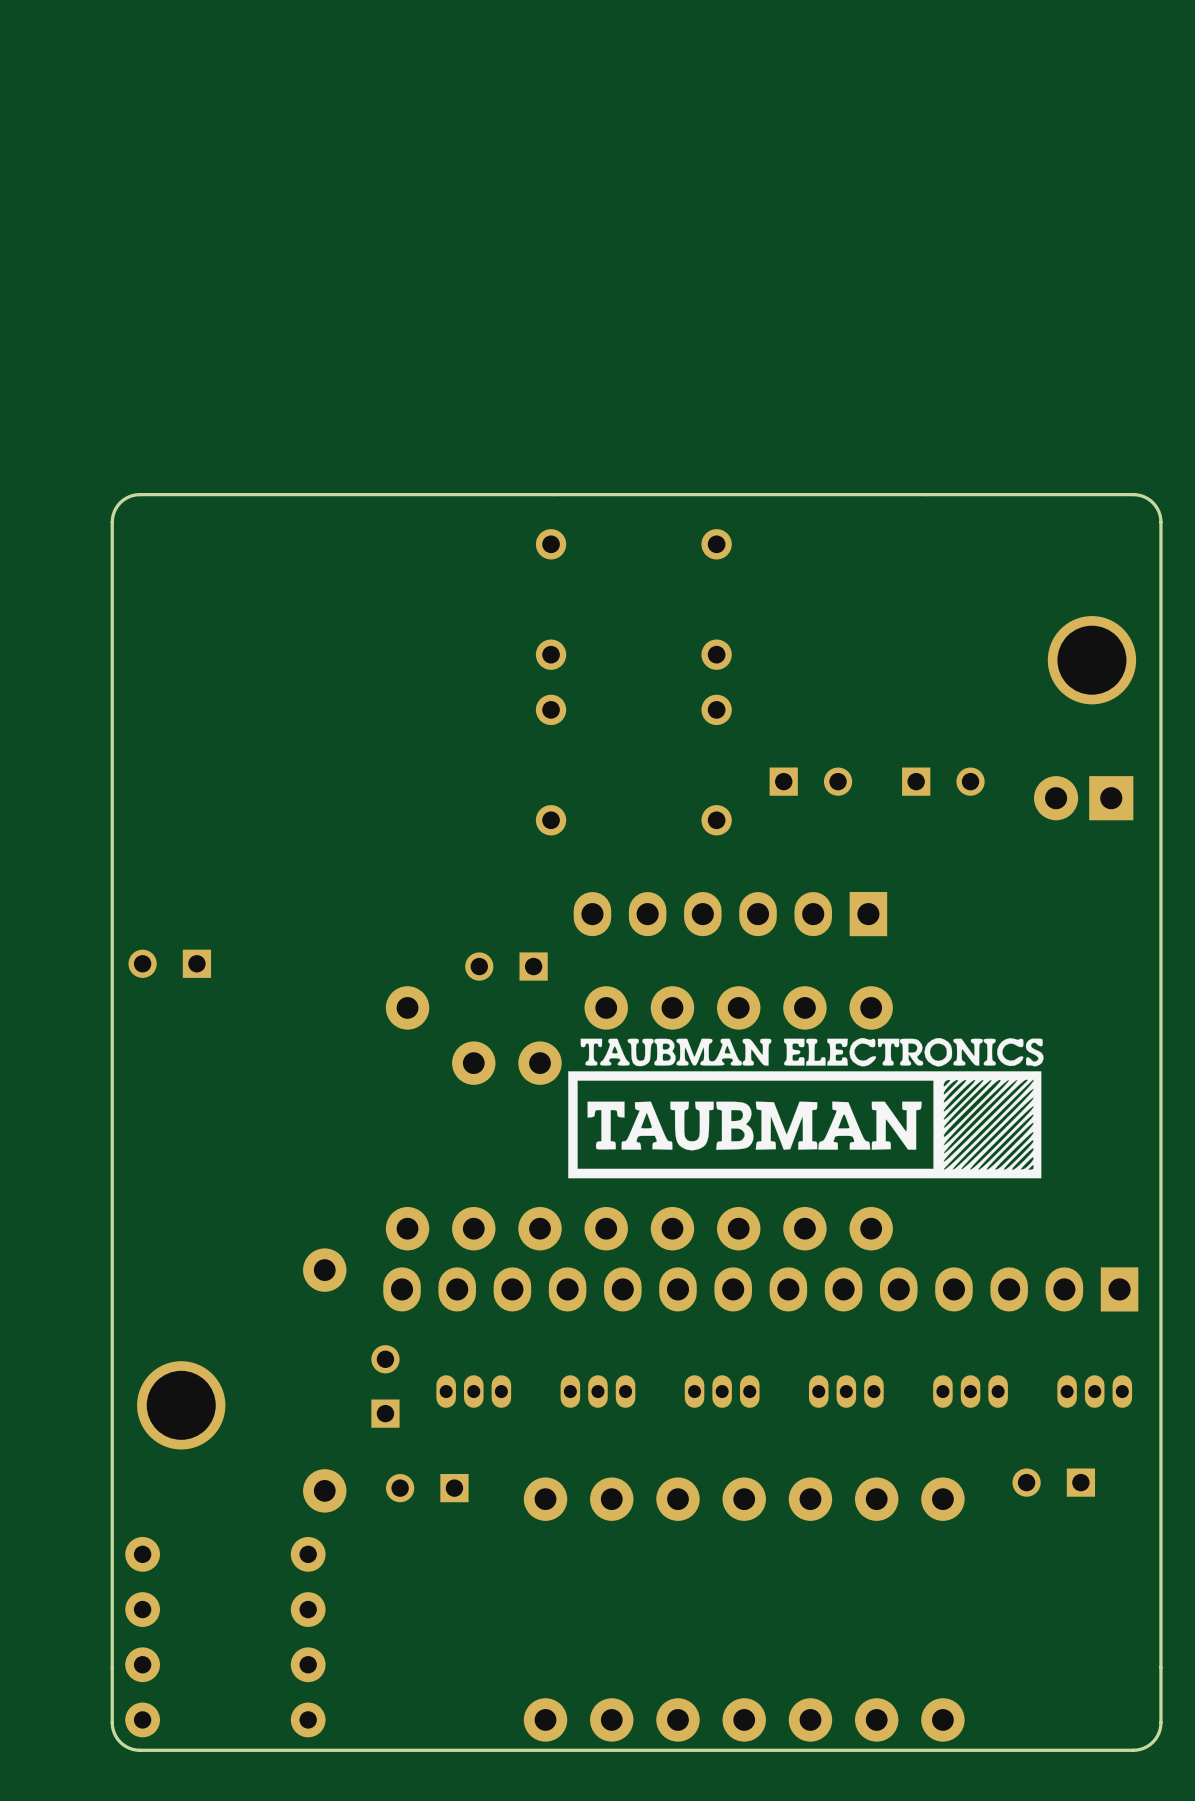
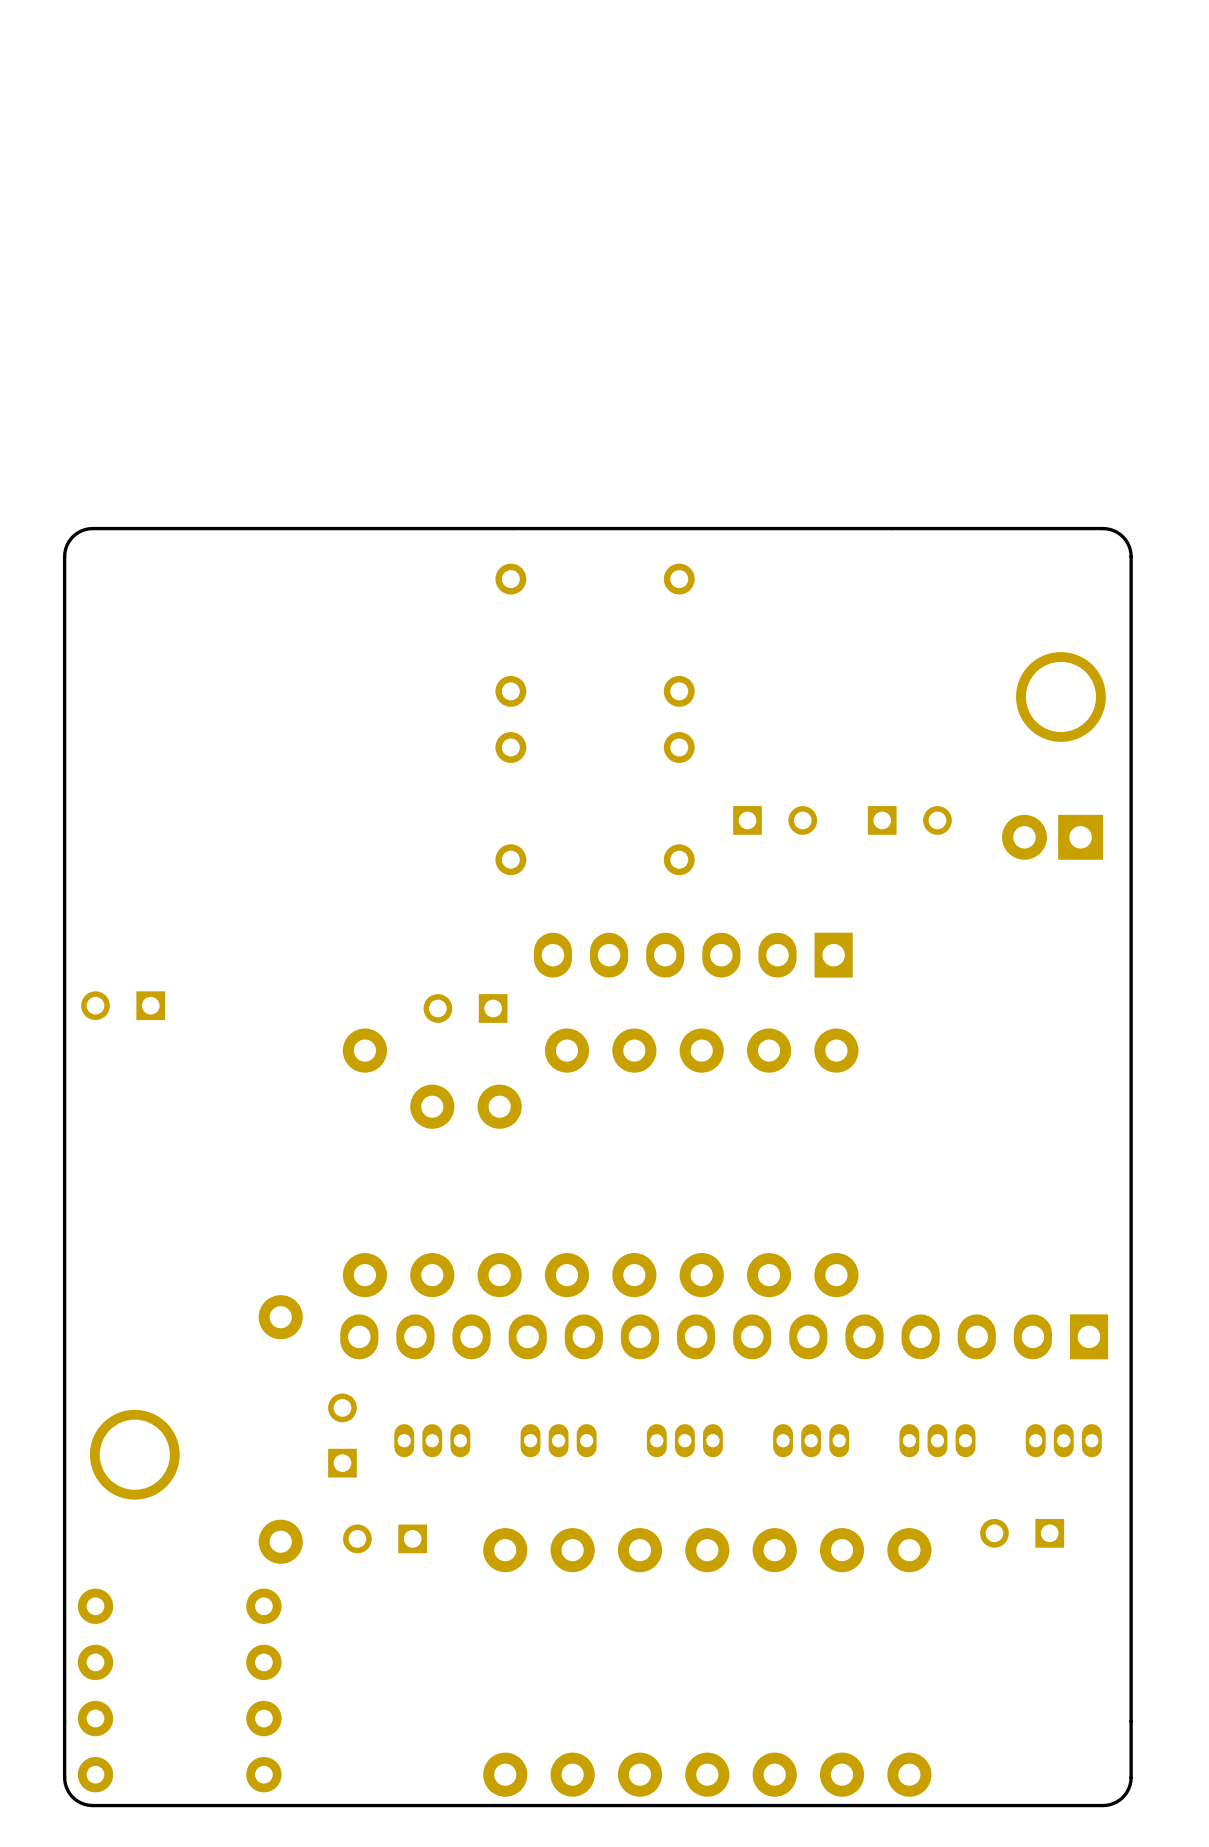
drawing: [568, 1037, 1044, 1179] -> none

